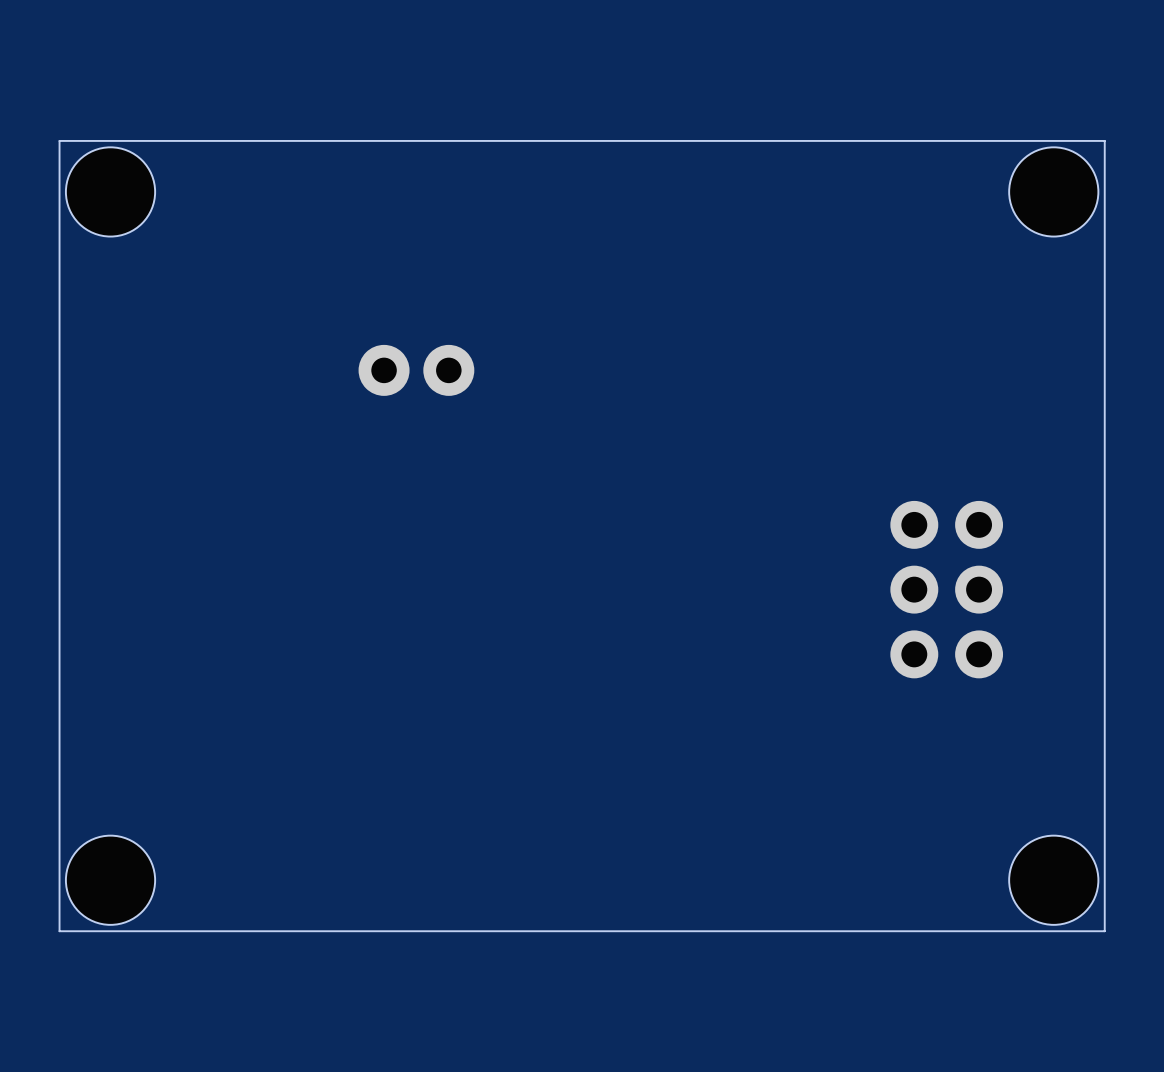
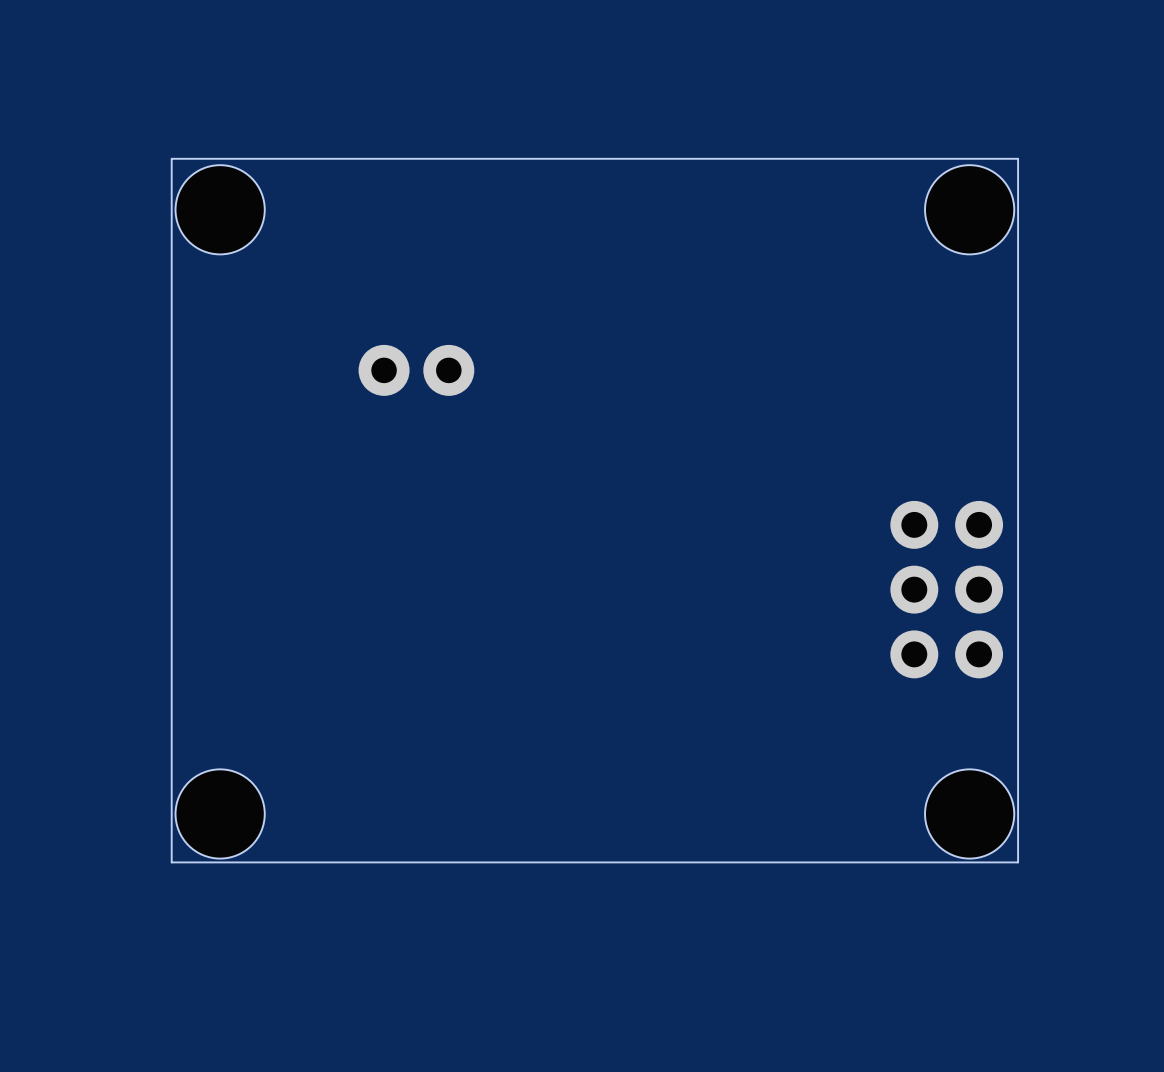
board edge: (1104, 140) (59, 140) (59, 931) (1104, 931) (1104, 140) -> (1018, 158) (1018, 862) (171, 862) (171, 158) (1018, 158)
hole position: (110, 191) -> (220, 209)
hole position: (1053, 191) -> (969, 209)
hole position: (110, 880) -> (220, 813)
hole position: (1053, 880) -> (969, 813)

